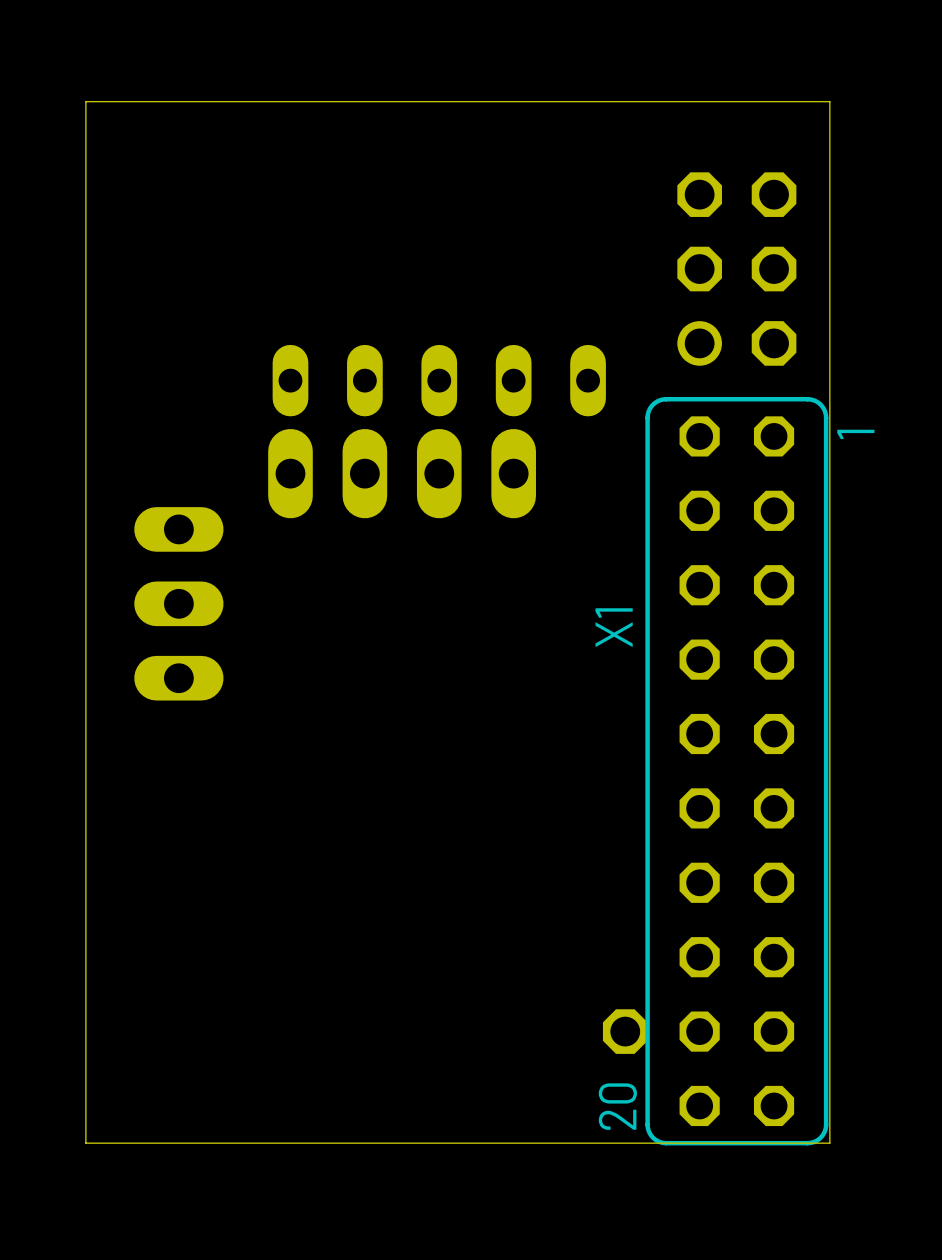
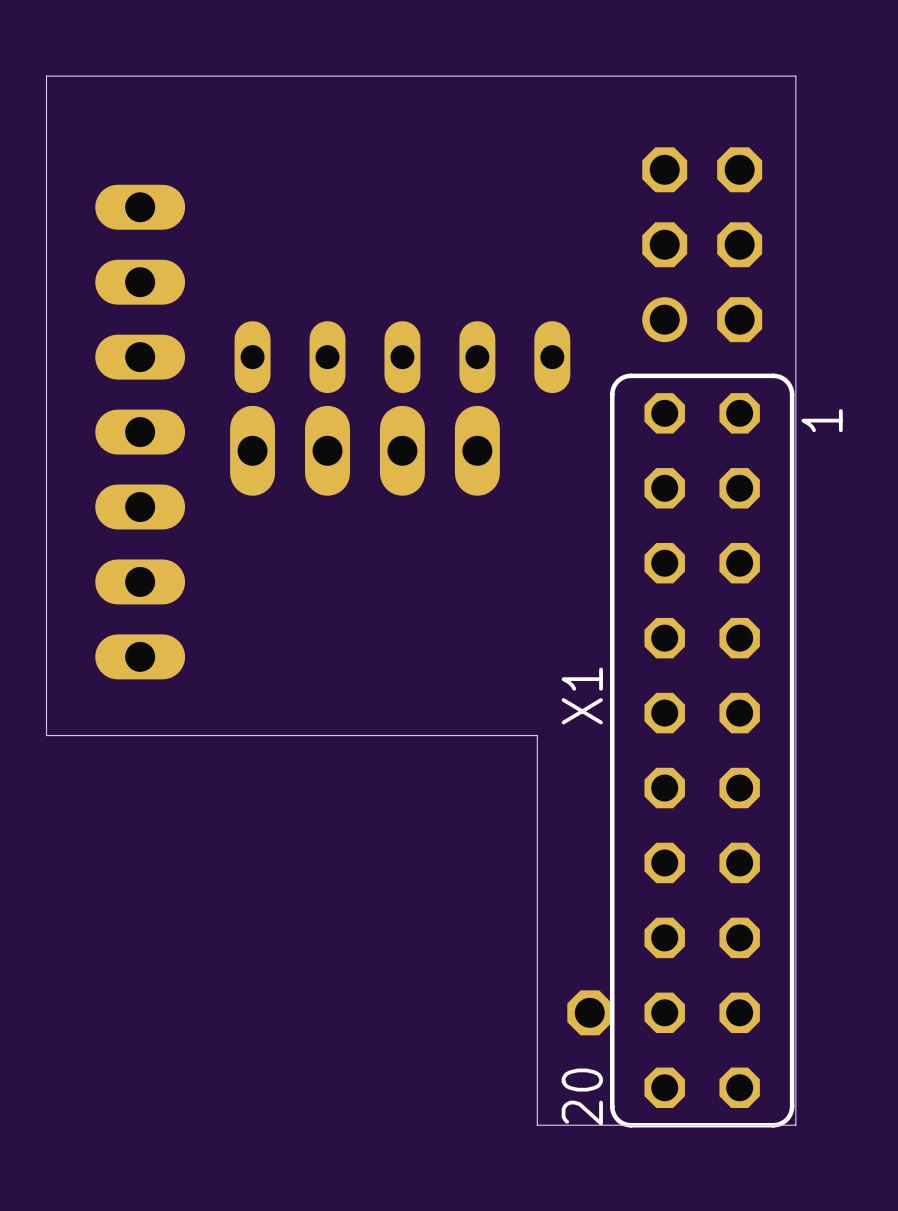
part: none -> (140, 319)
X1 name position: X1 (614, 627) -> X1 (582, 696)
board edge: (85, 756) (85, 1143) (573, 1143) -> (46, 735) (537, 735) (537, 1125)

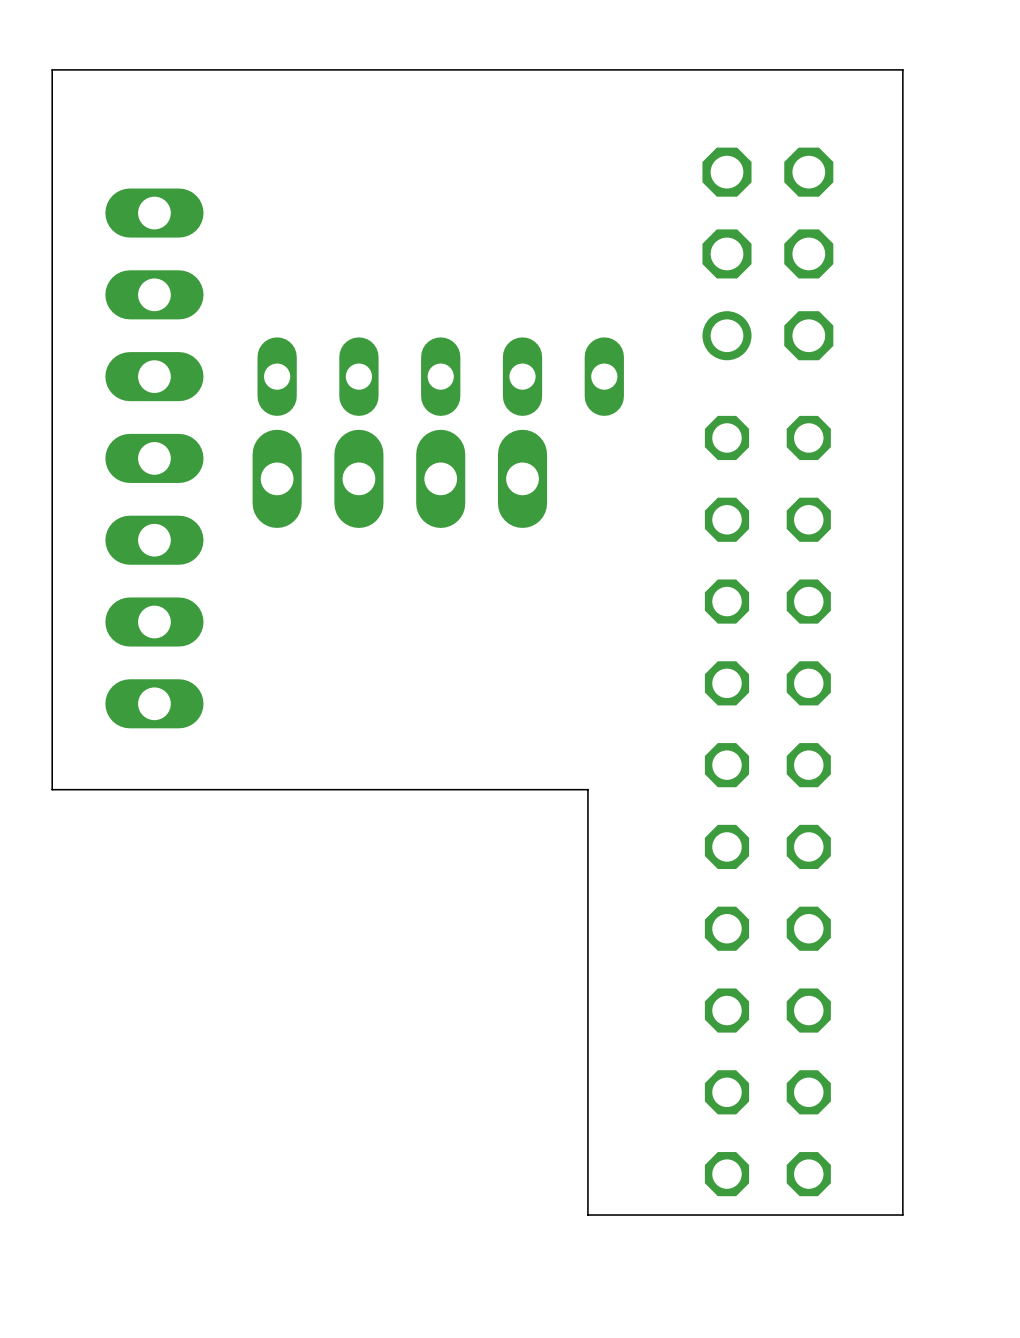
board edge: (795, 76) (795, 1125) -> (870, 69) (902, 69) (902, 1215) (870, 1215)
X1: (702, 750) -> none
part: (589, 1012) -> none

